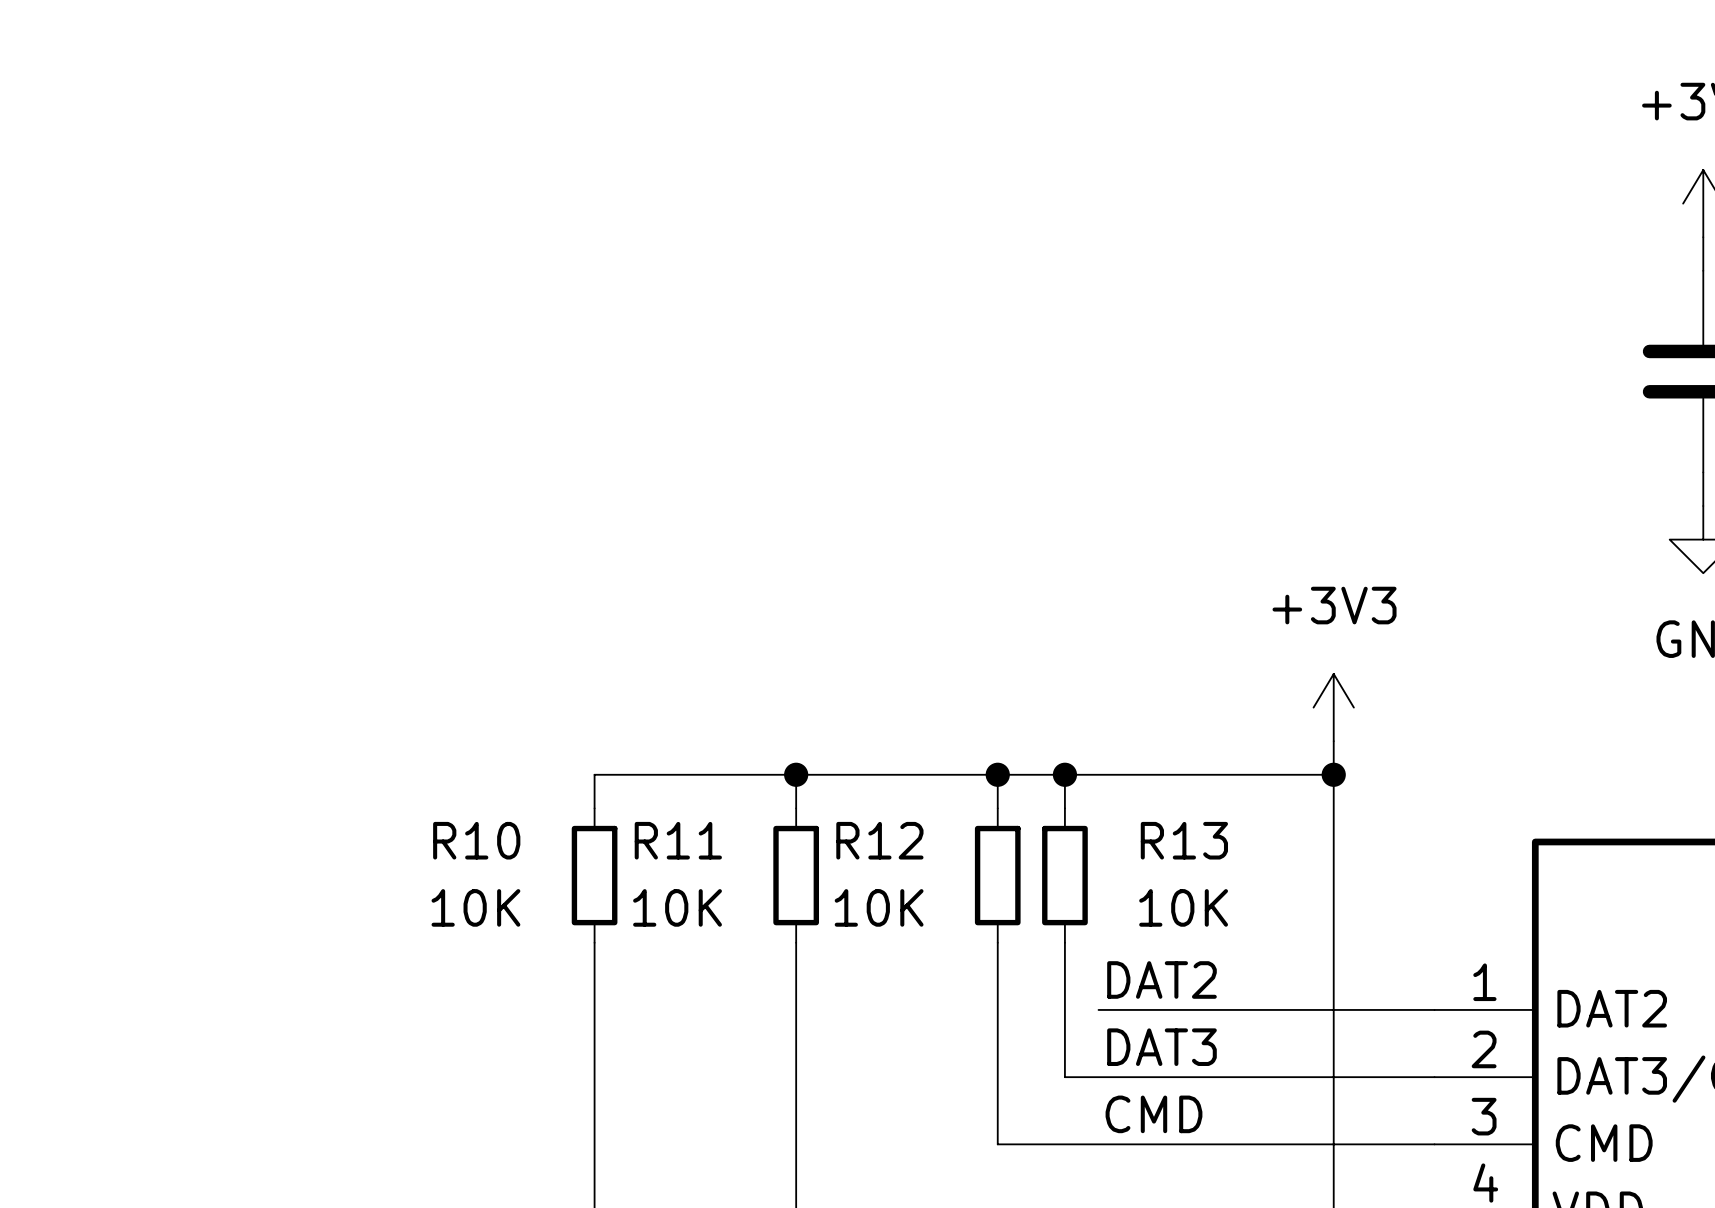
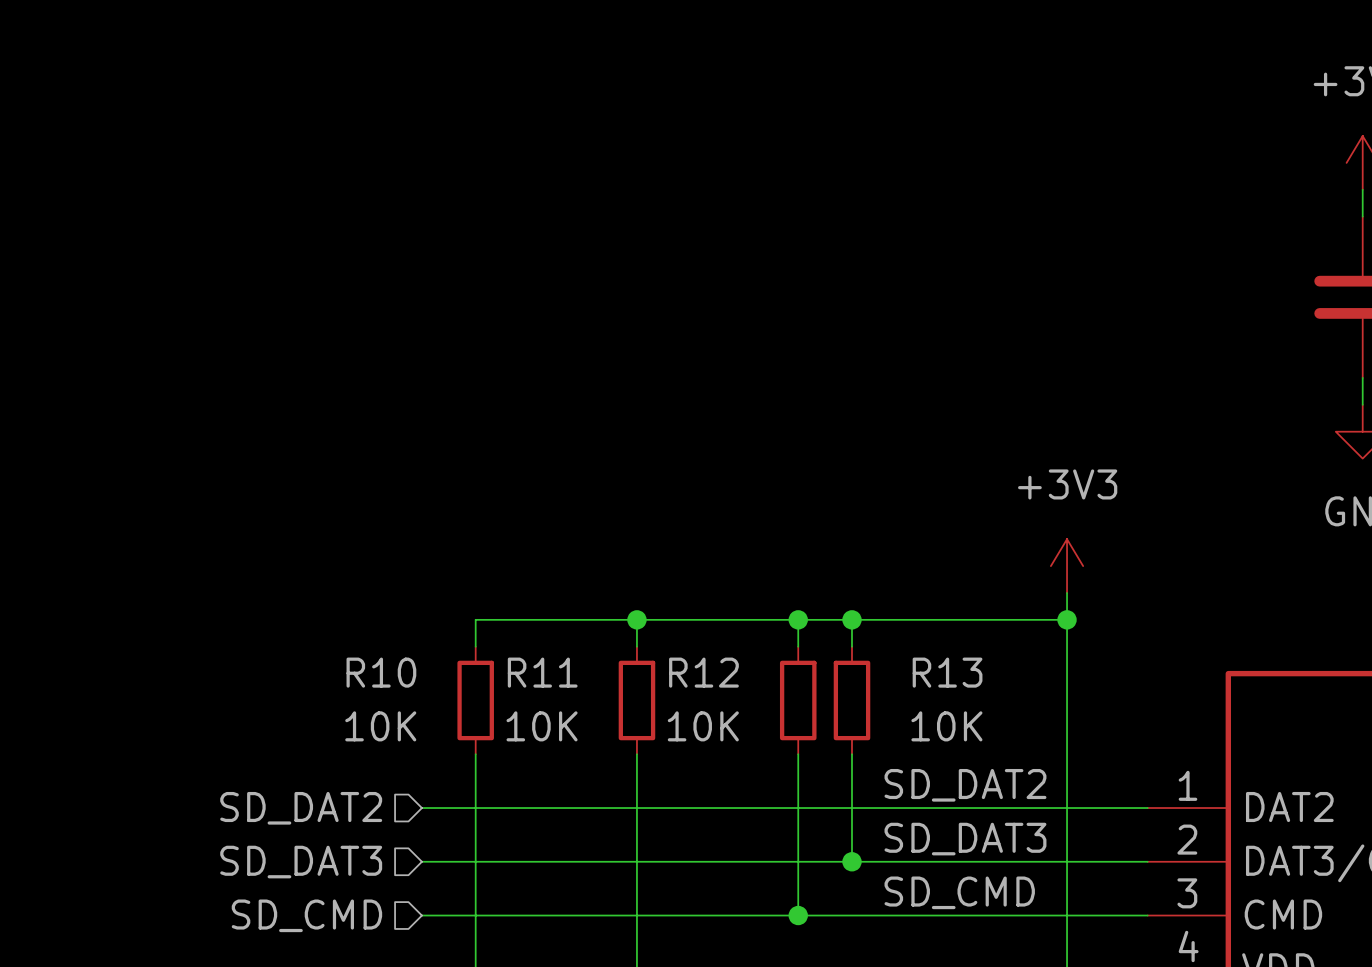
label: DAT2 (1161, 979) -> SD_DAT2 (965, 785)
wire: none -> (421, 808) (878, 808)
hierarchical label: none -> SD_DAT2 (301, 808)
label: DAT3 (1161, 1047) -> SD_DAT3 (965, 839)
hierarchical label: none -> SD_DAT3 (301, 862)
wire: none -> (421, 861) (852, 861)
junction: none -> (852, 861)
label: CMD (1153, 1114) -> SD_CMD (959, 892)
hierarchical label: none -> SD_CMD (306, 915)
wire: none -> (421, 915) (798, 915)
junction: none -> (798, 915)

